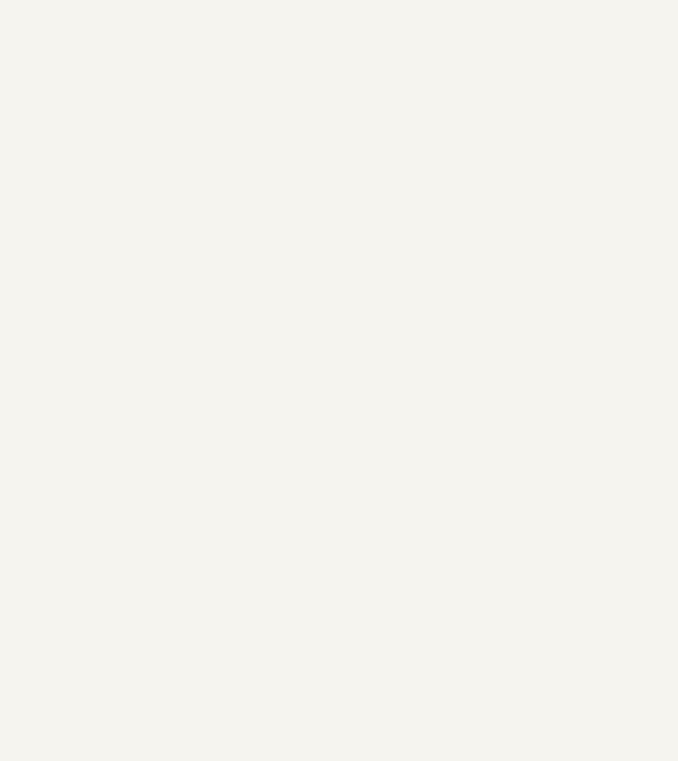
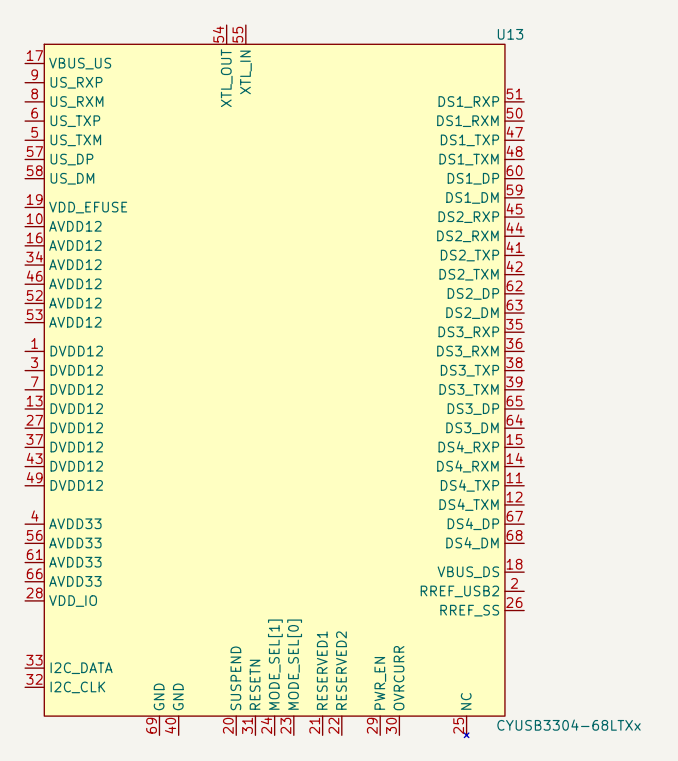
U13: none -> CYUSB3304-68LTXx (274, 381)

